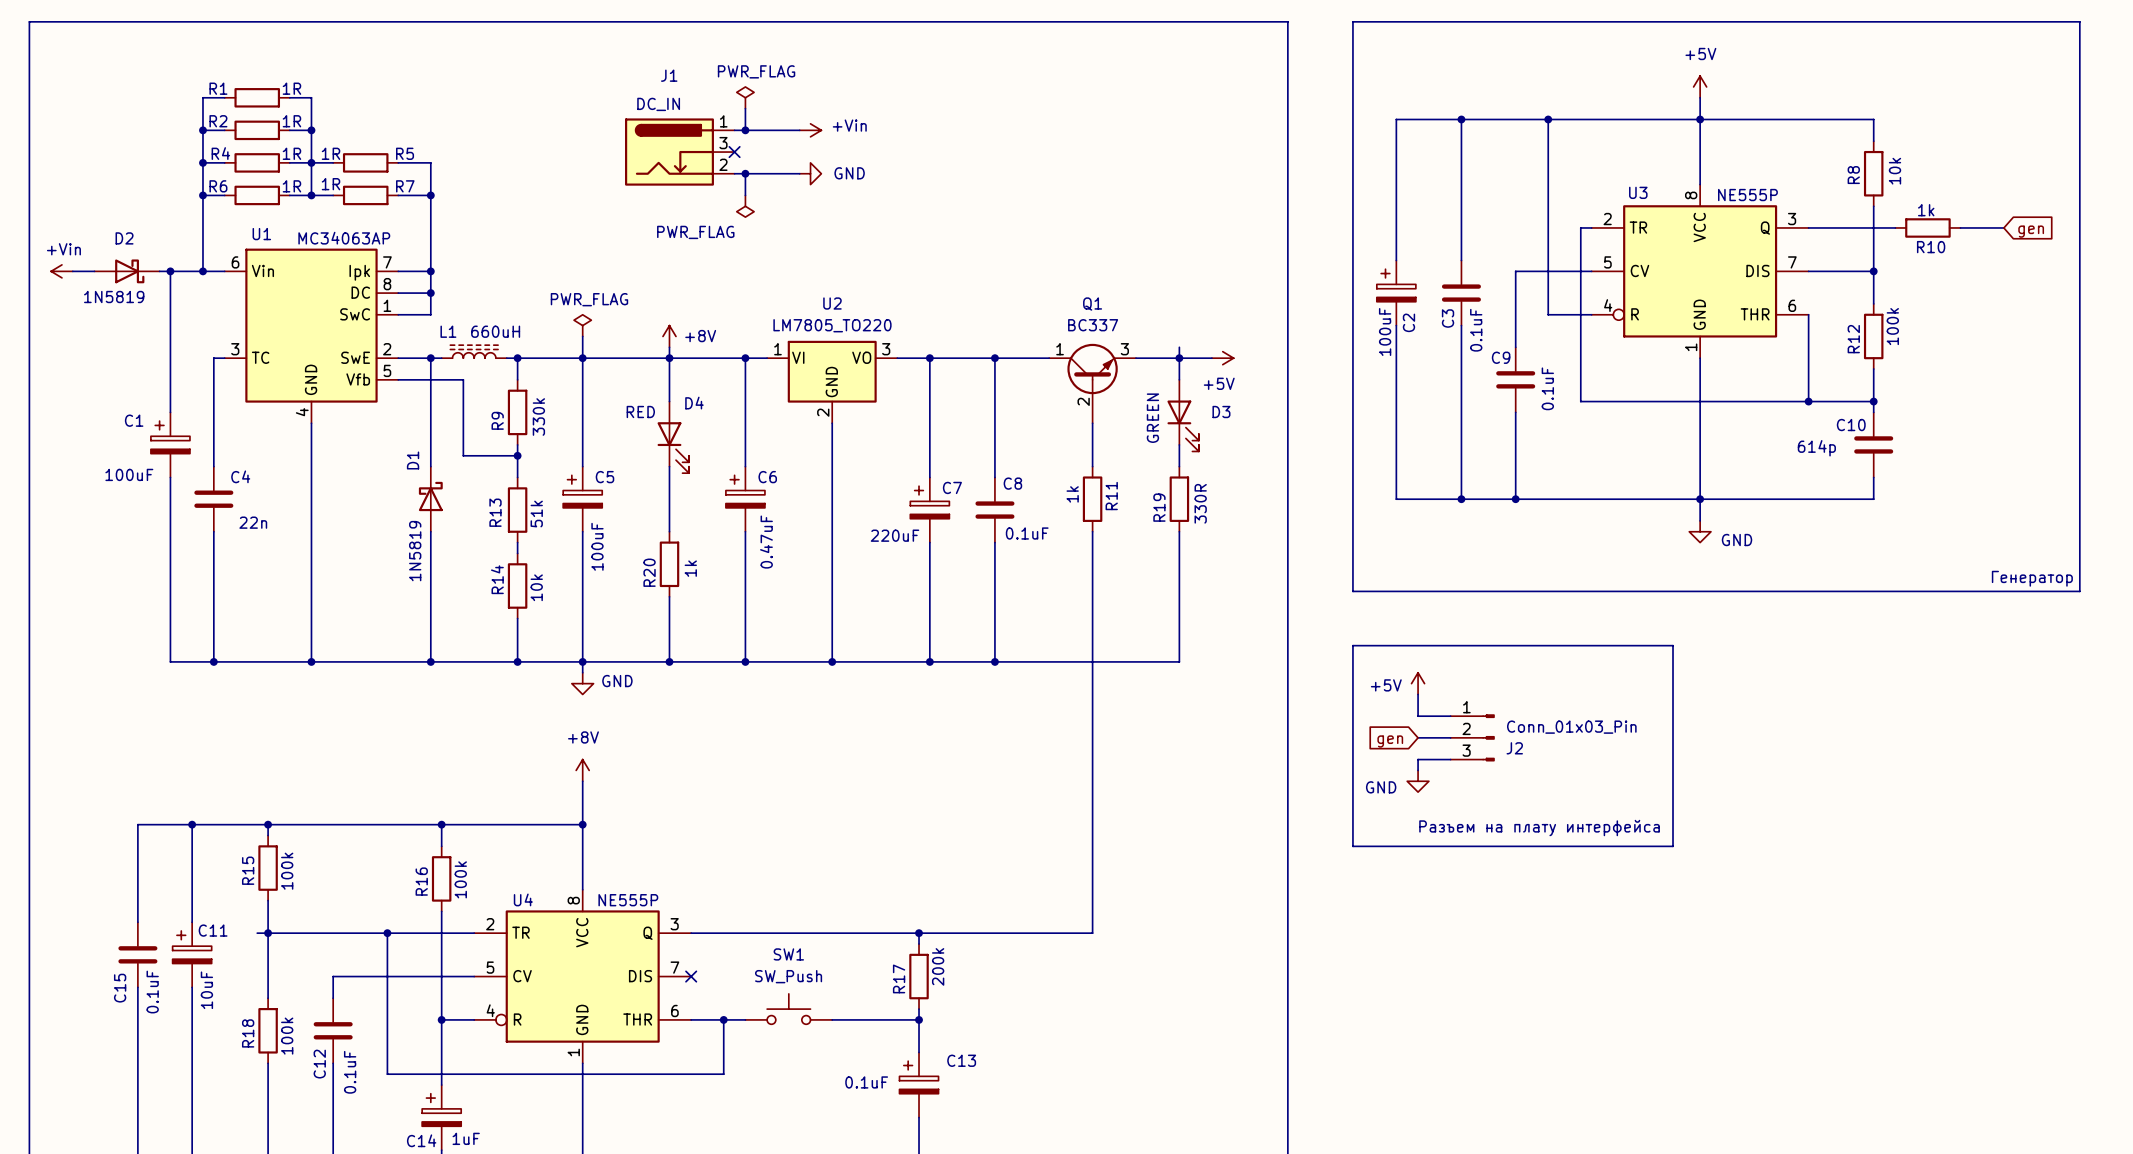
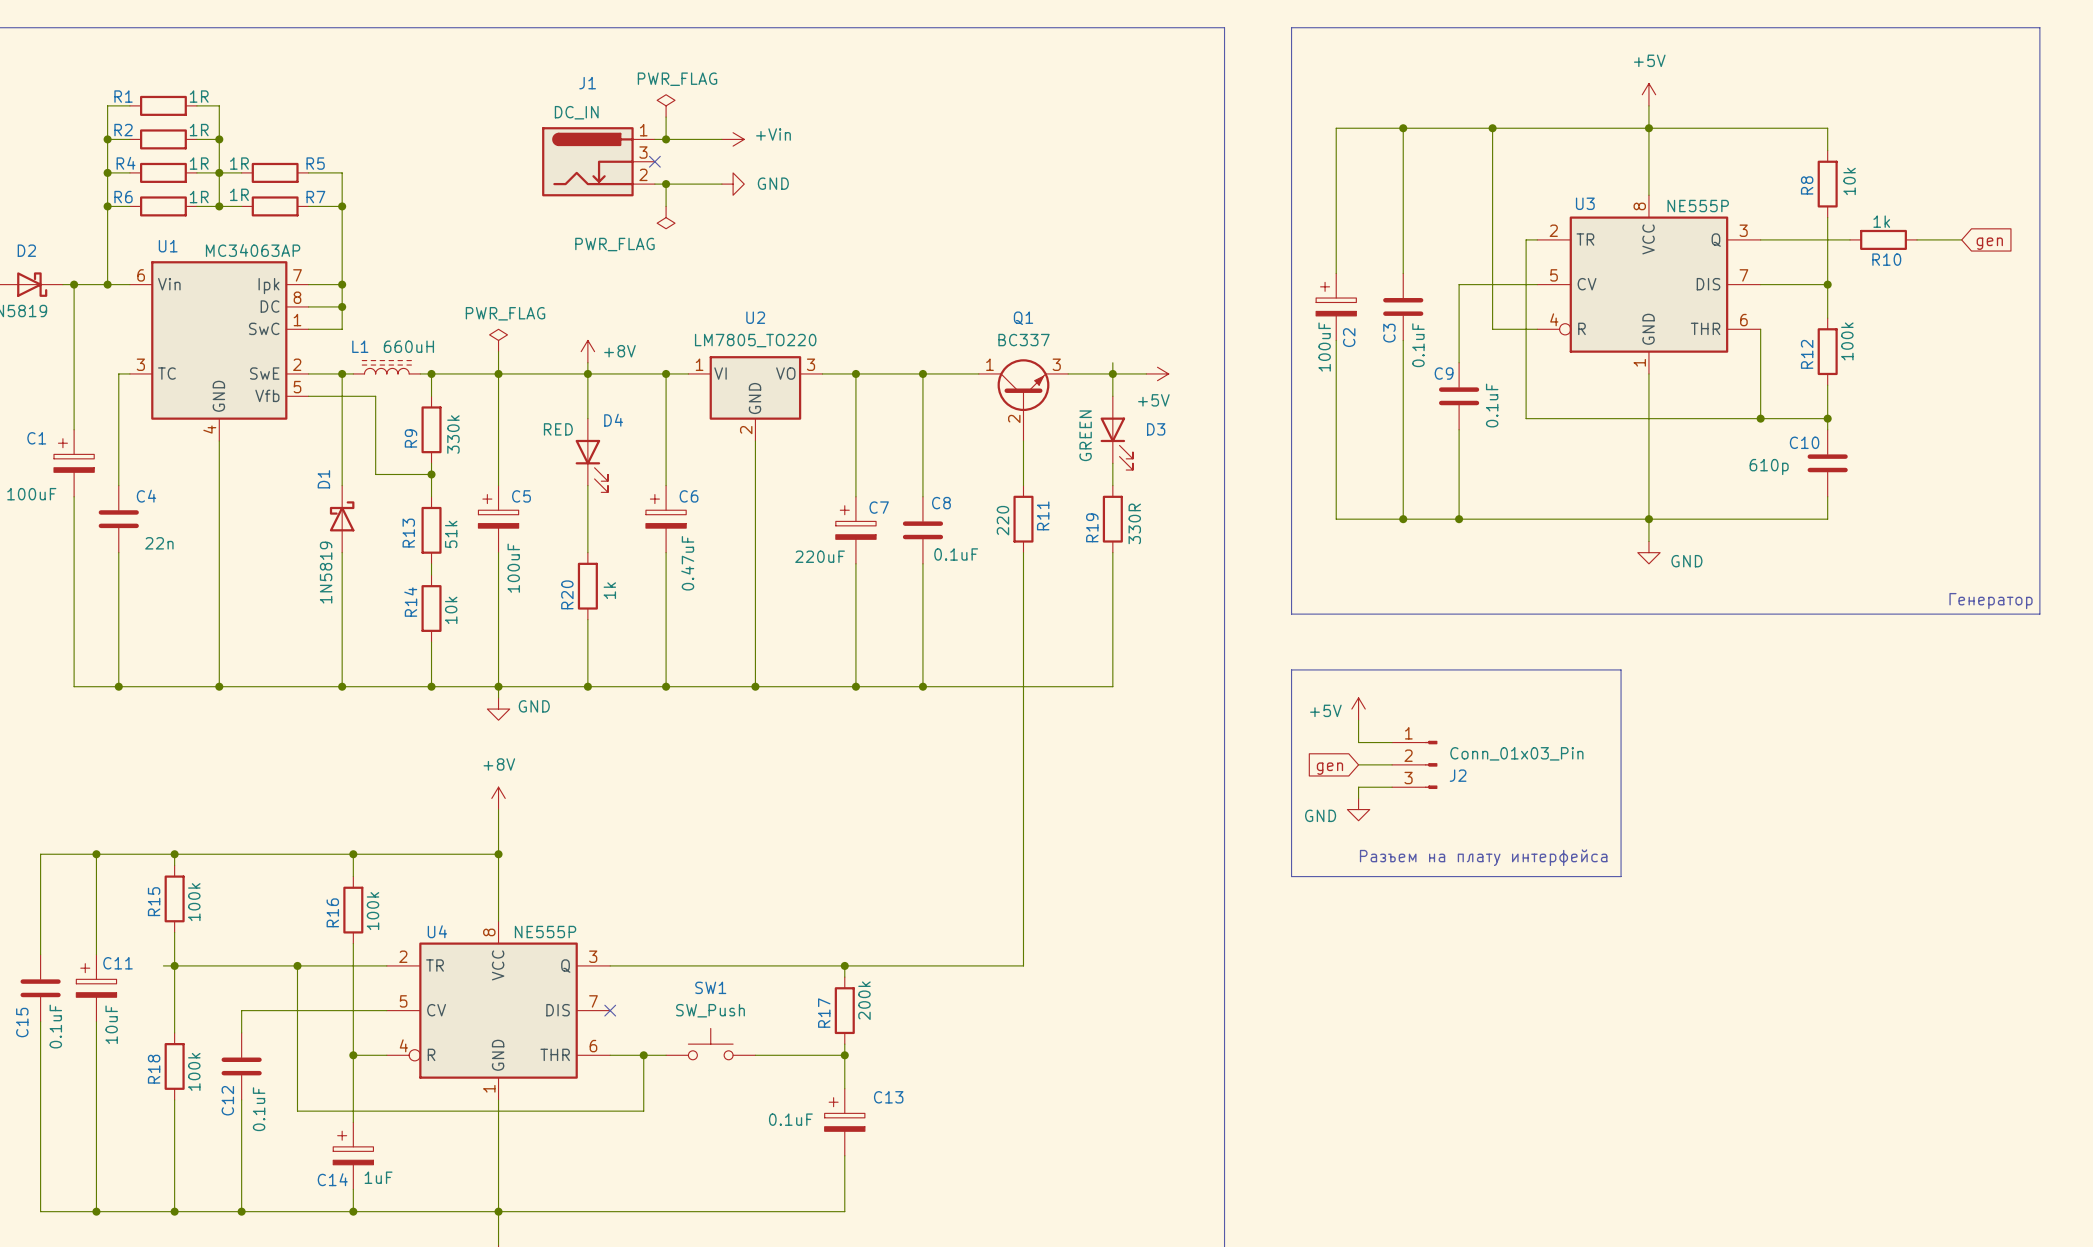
C10 value: 614p (1816, 448) -> 610p (1769, 467)
R11 value: 1k (1072, 494) -> 220 (1002, 520)

